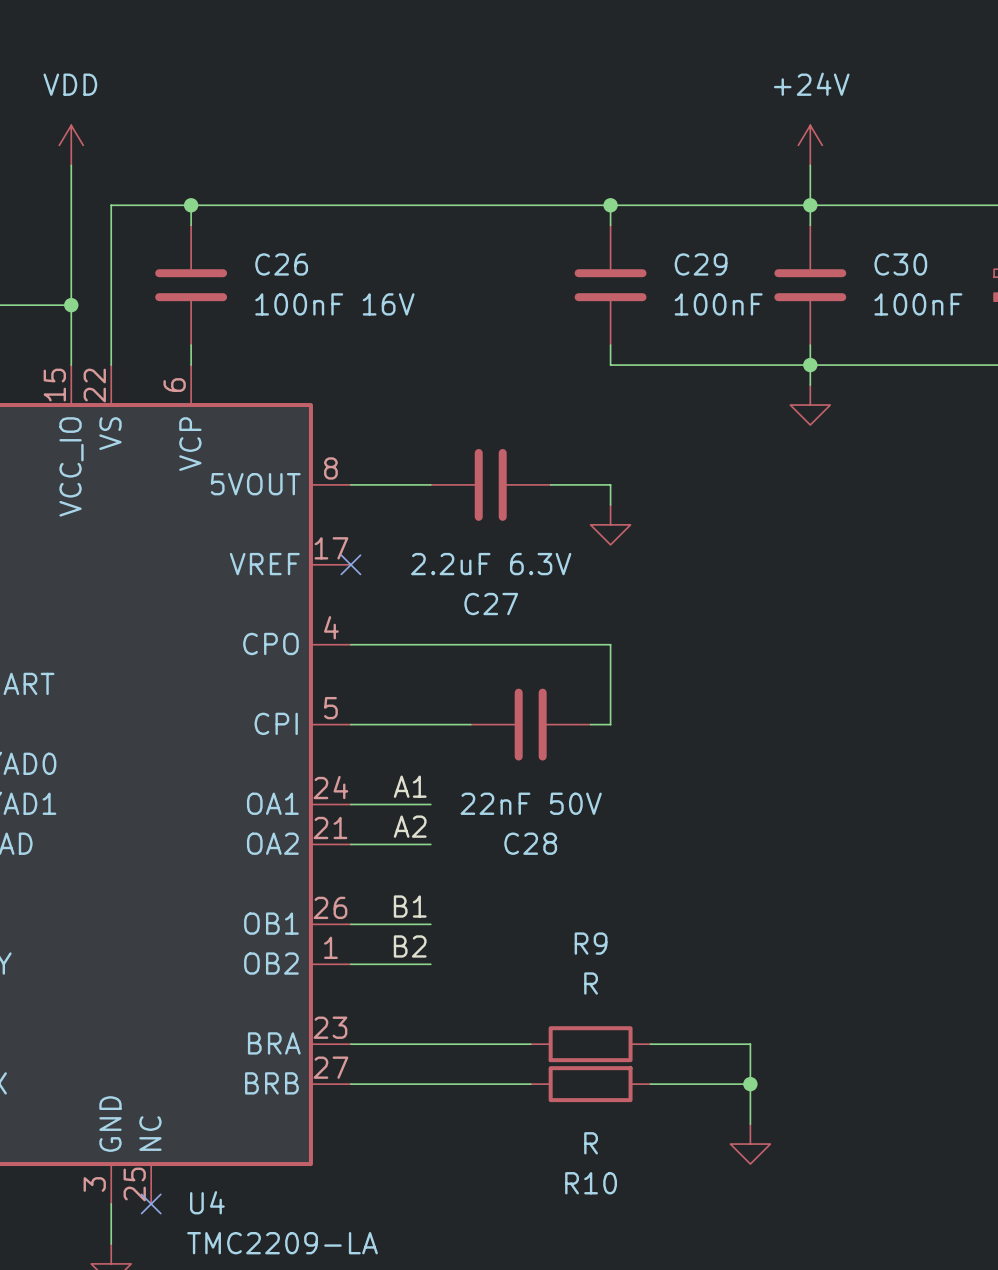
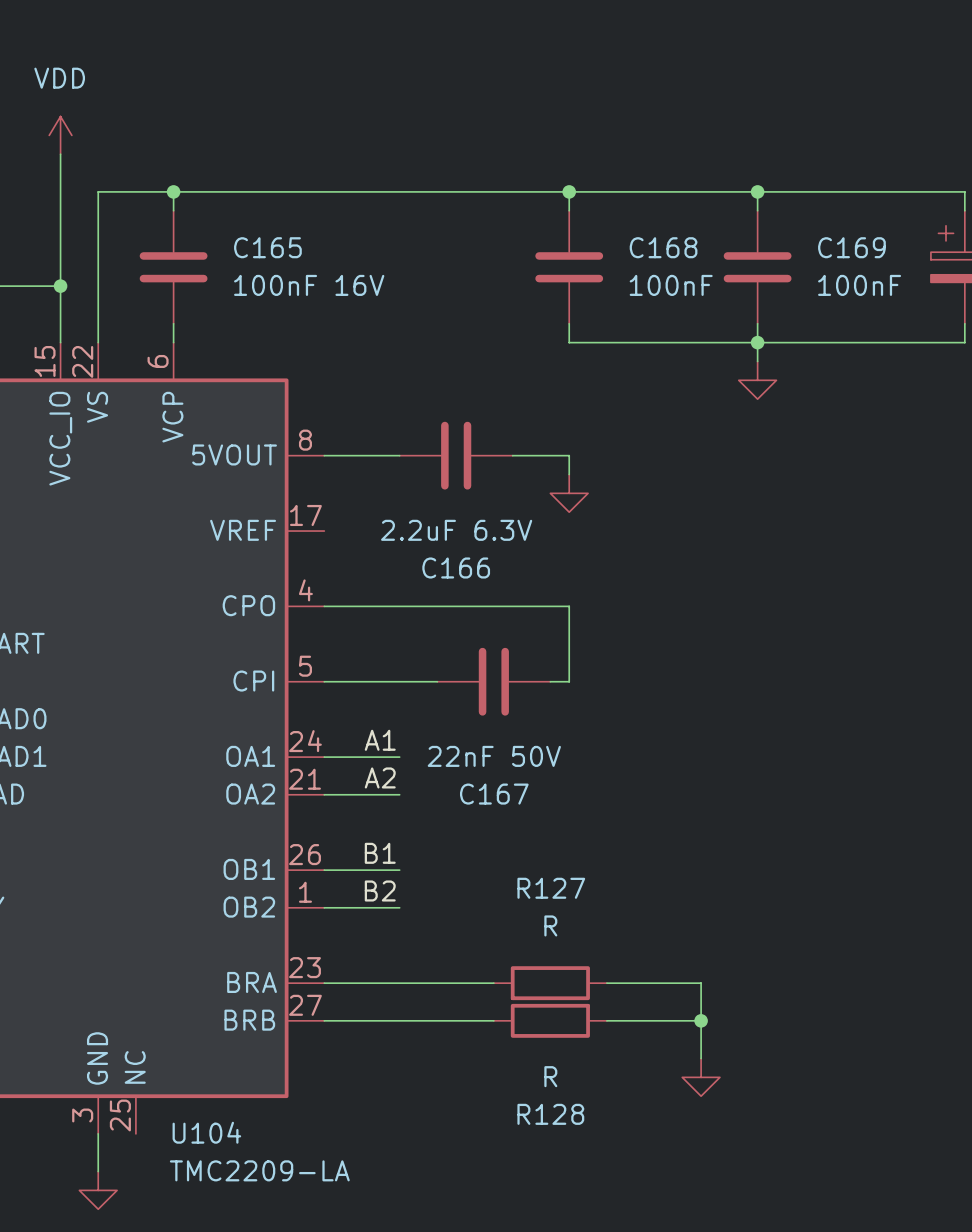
power symbol: +24V (810, 145) -> none
wire: (810, 165) (810, 205) -> none
C26 name: C26 (281, 264) -> C165 (267, 247)
C29 name: C29 (701, 264) -> C168 (663, 247)
C30 name: C30 (900, 264) -> C169 (851, 247)
no-connect mark: (350, 564) -> none
C27 name: C27 (491, 604) -> C166 (456, 568)
C28 name: C28 (530, 843) -> C167 (494, 794)
R9 name: R9 (591, 943) -> R127 (551, 888)
R10 name: R10 (591, 1183) -> R128 (550, 1114)
U4 name: U4 (207, 1202) -> U104 (206, 1132)
no-connect mark: (151, 1203) -> none

